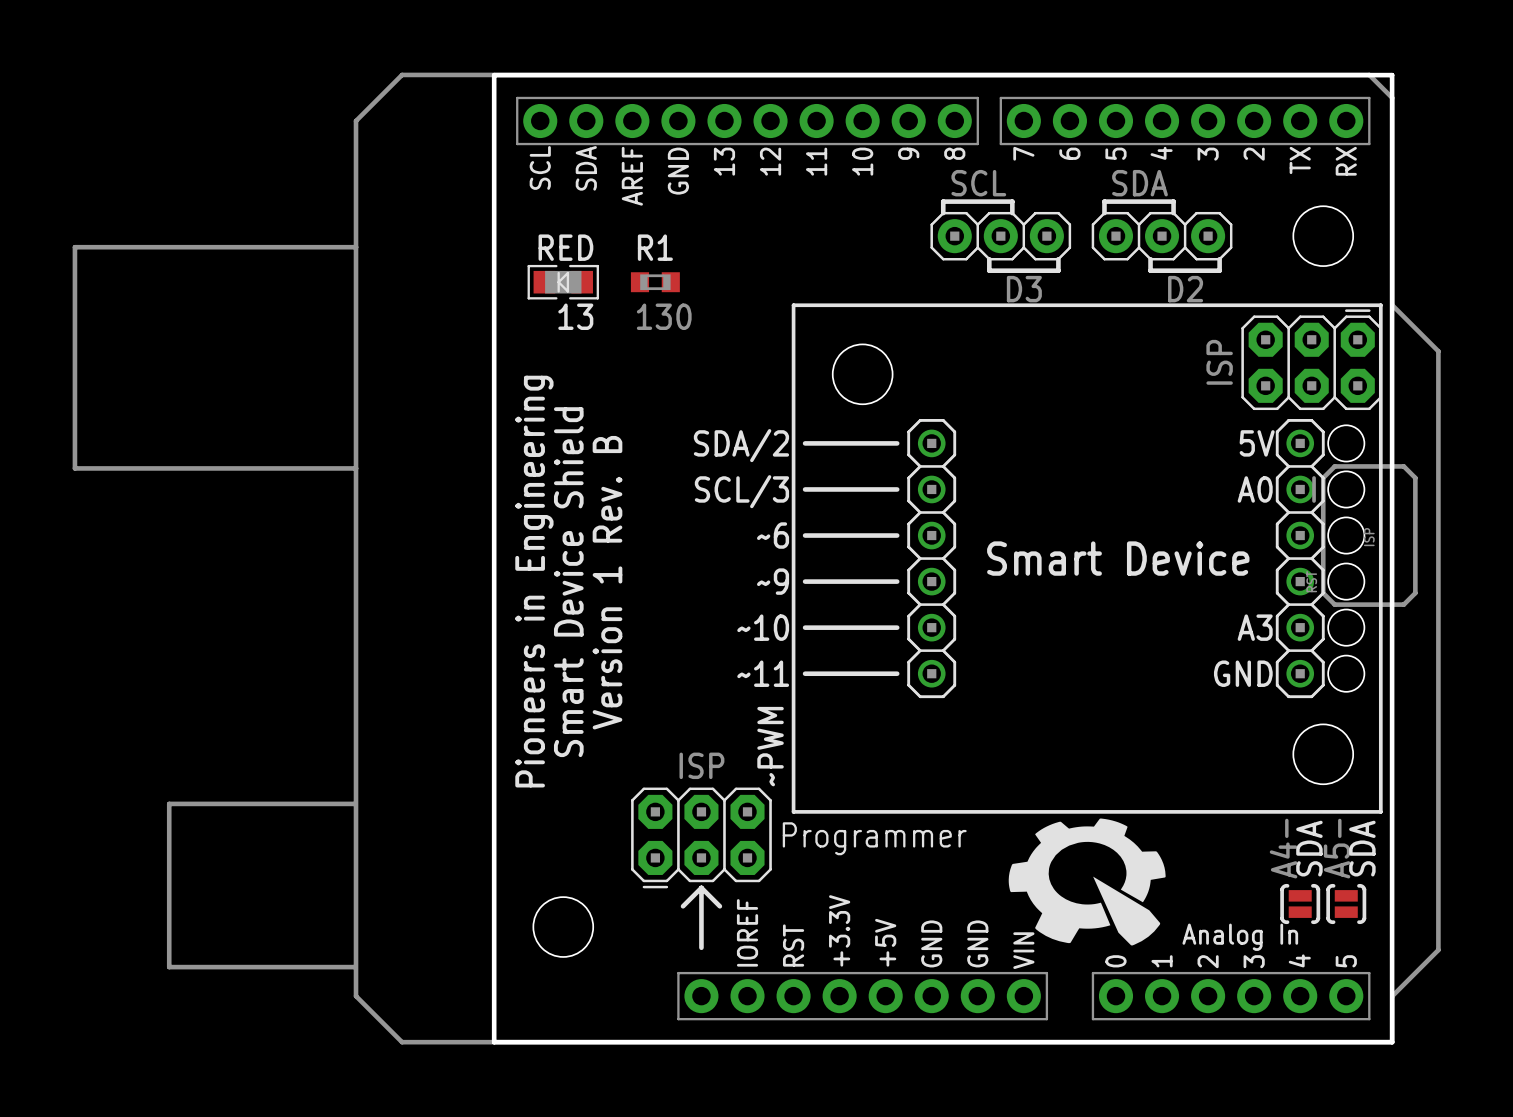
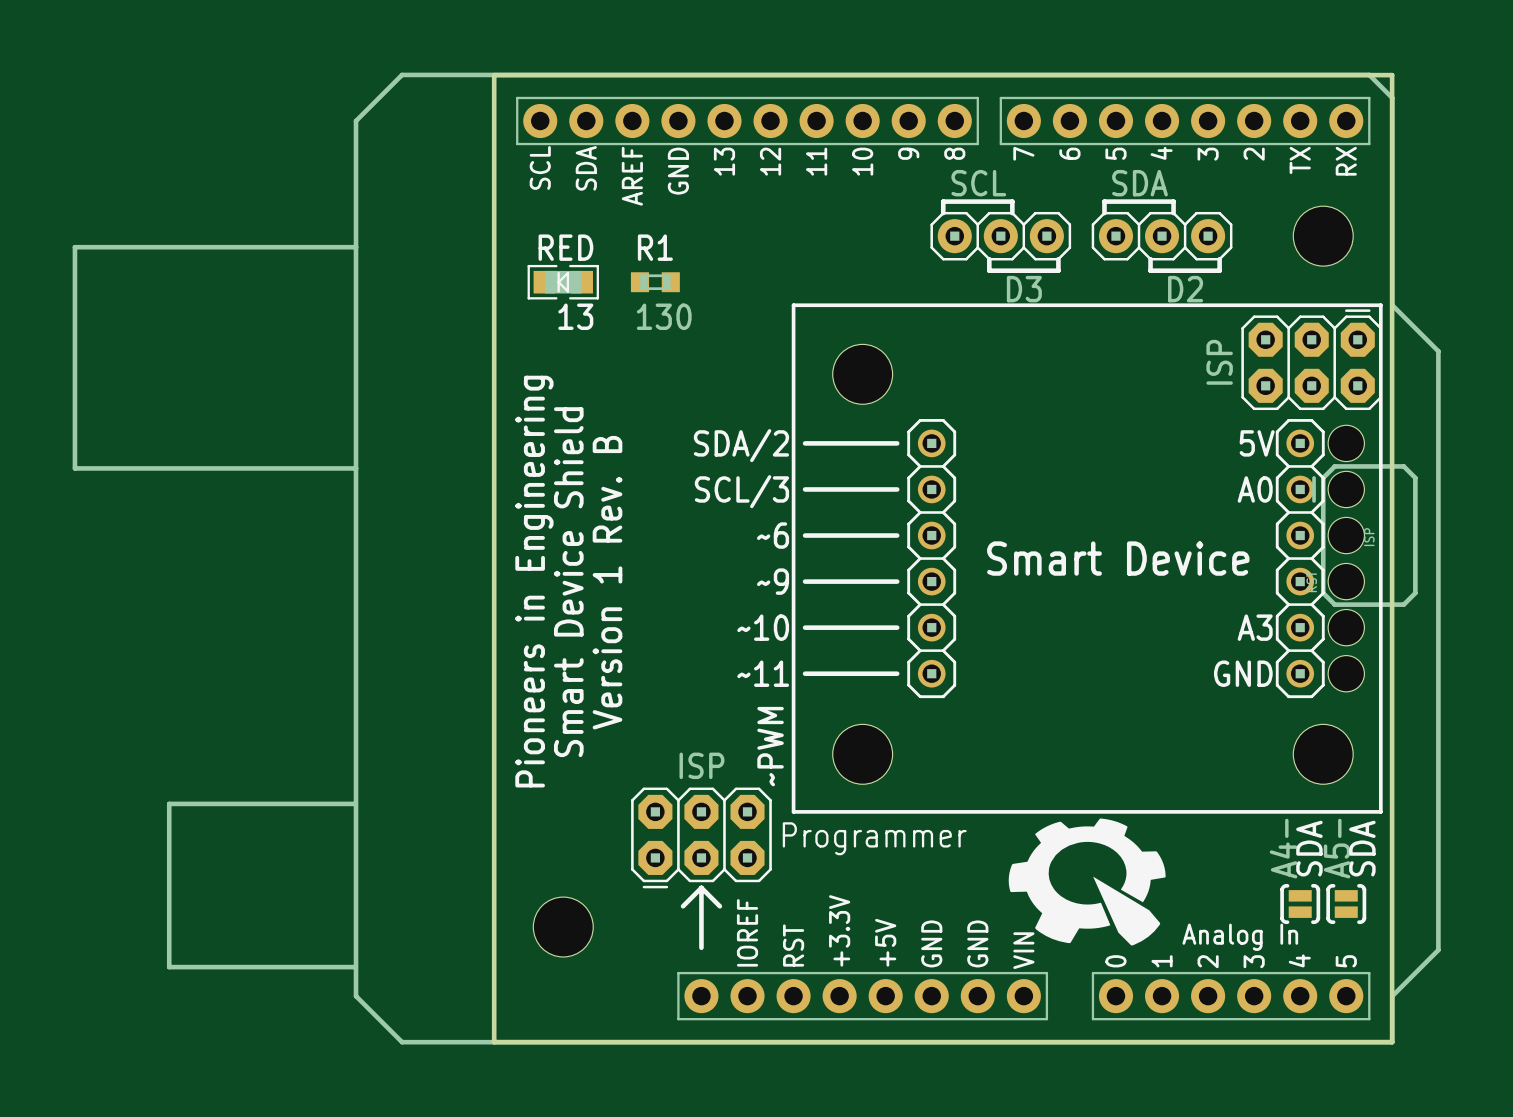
part: none -> (862, 754)

